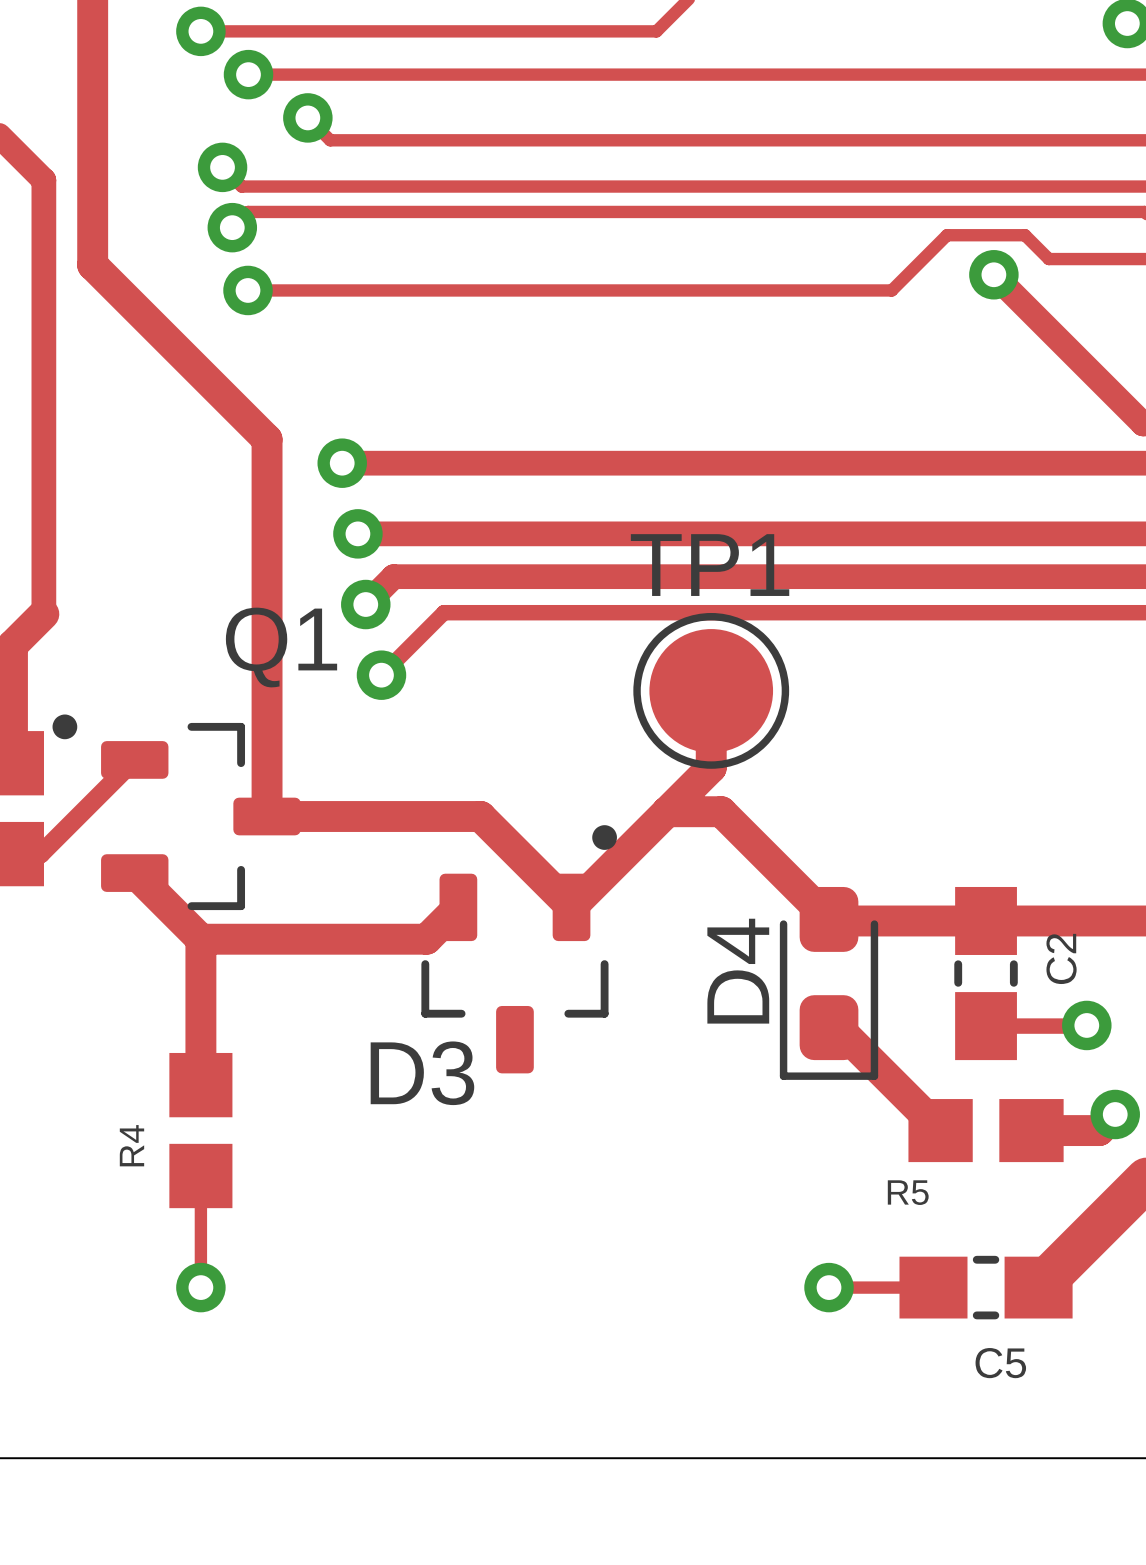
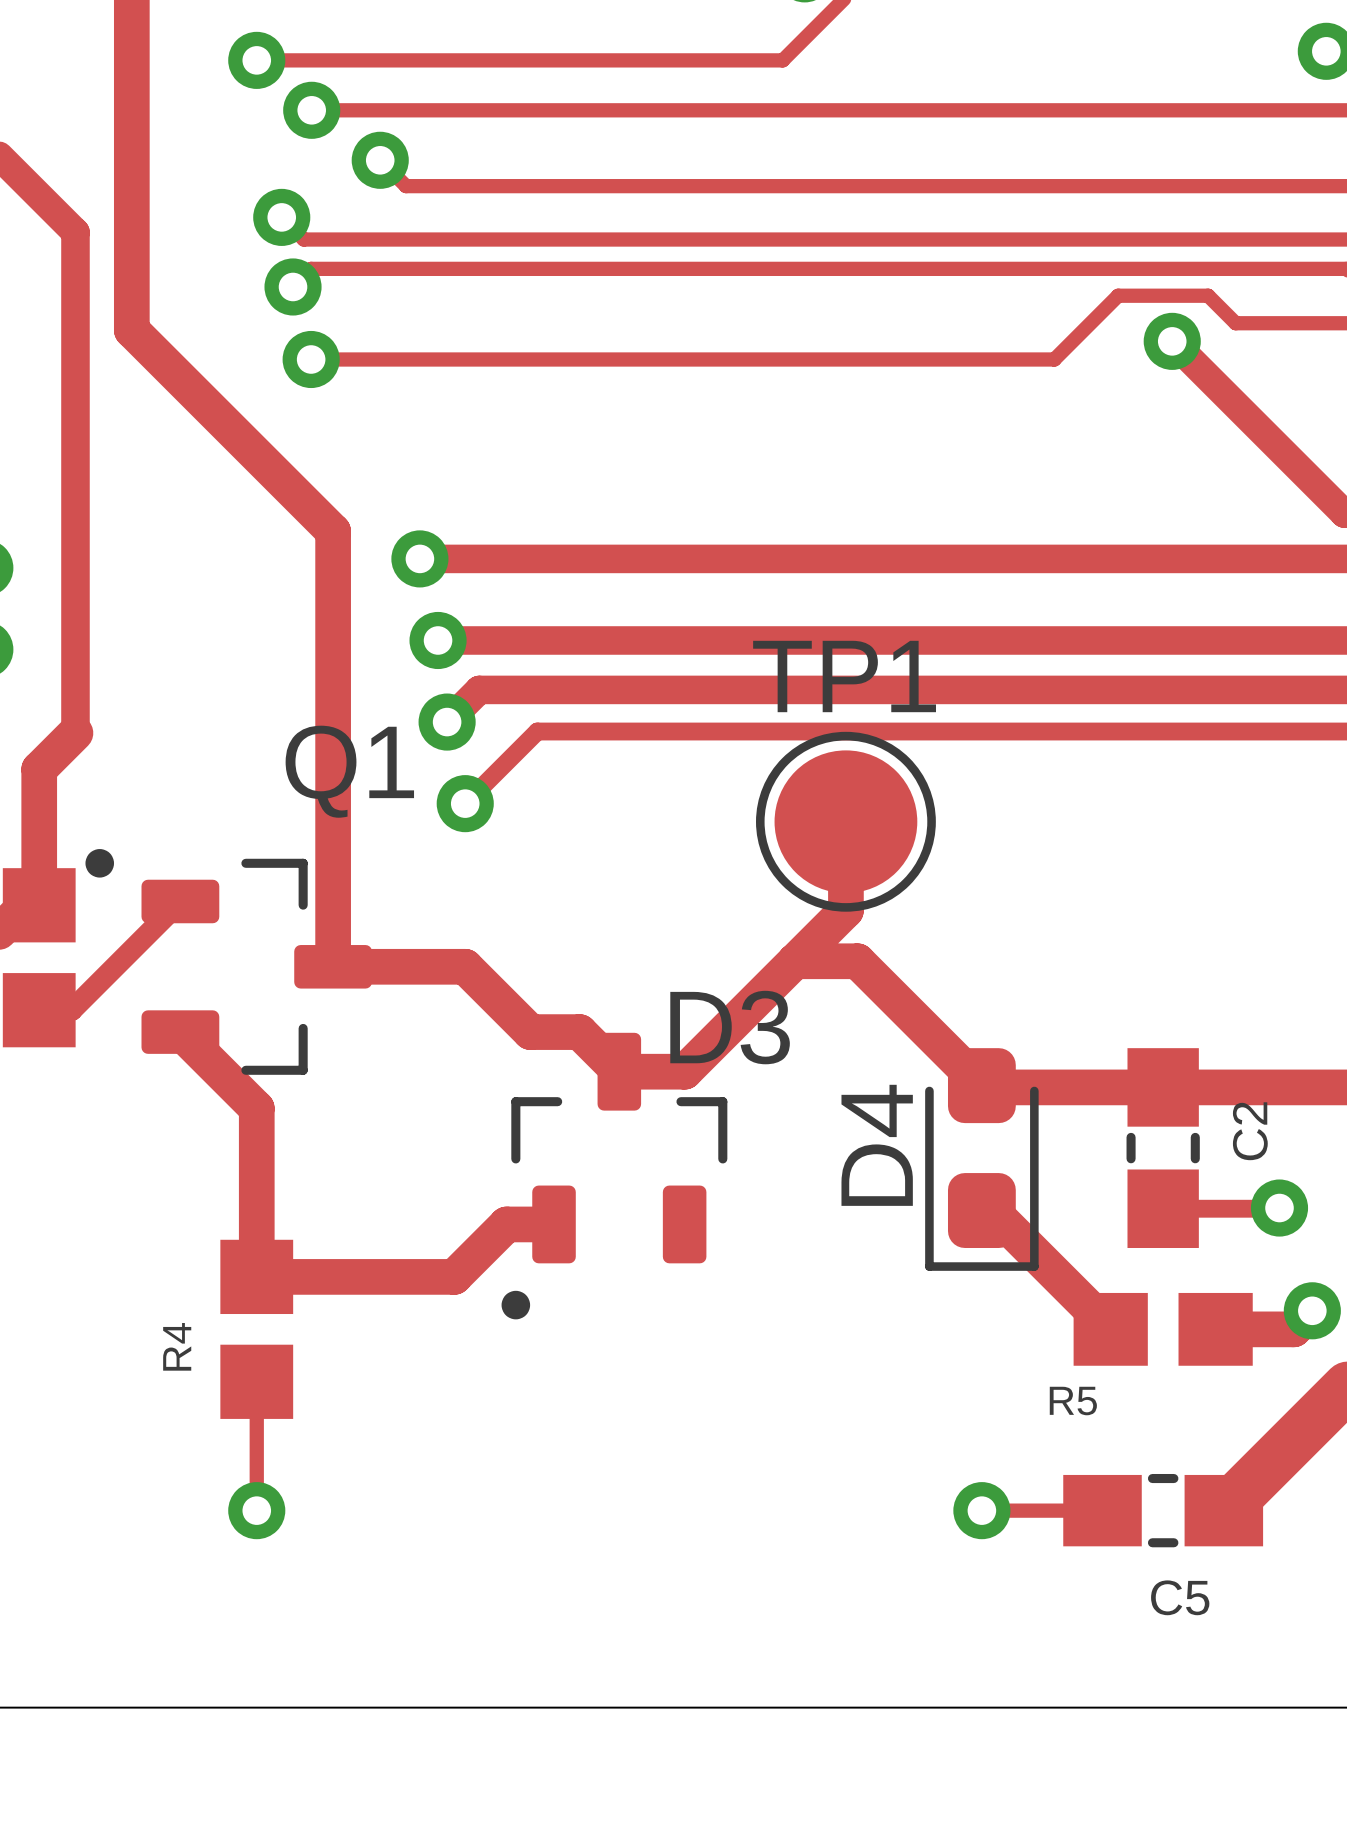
track: (381, 816) (480, 816) (571, 907) -> (465, 966) (530, 1032) (579, 1032) (619, 1071) (684, 1071)
track: (458, 907) (426, 939) (200, 939) -> none
D3 rotation: 0° (519, 949) -> 180° (614, 1176)
track: none -> (554, 1224) (506, 1224) (454, 1276) (256, 1276)

